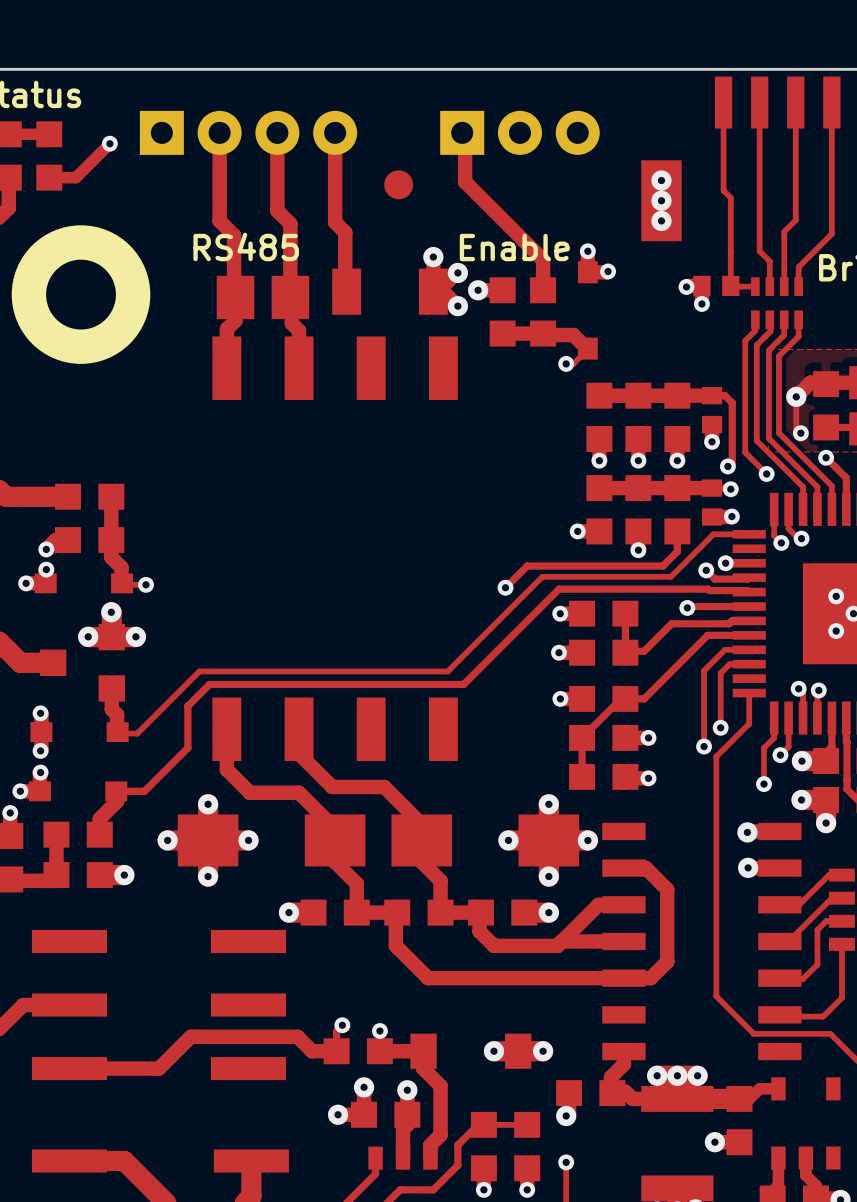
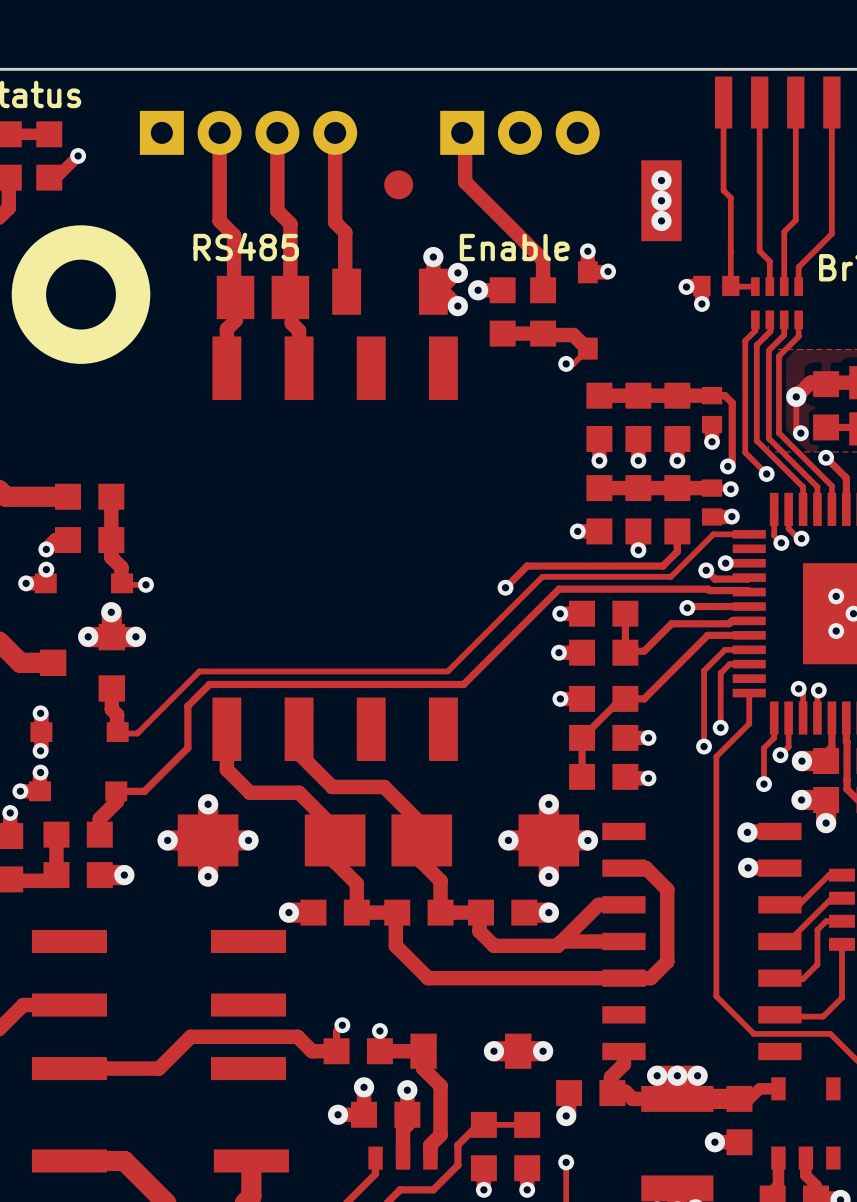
track: (109, 143) (75, 177) (56, 177) -> (78, 155) (56, 177)
via position: (109, 143) -> (78, 155)

